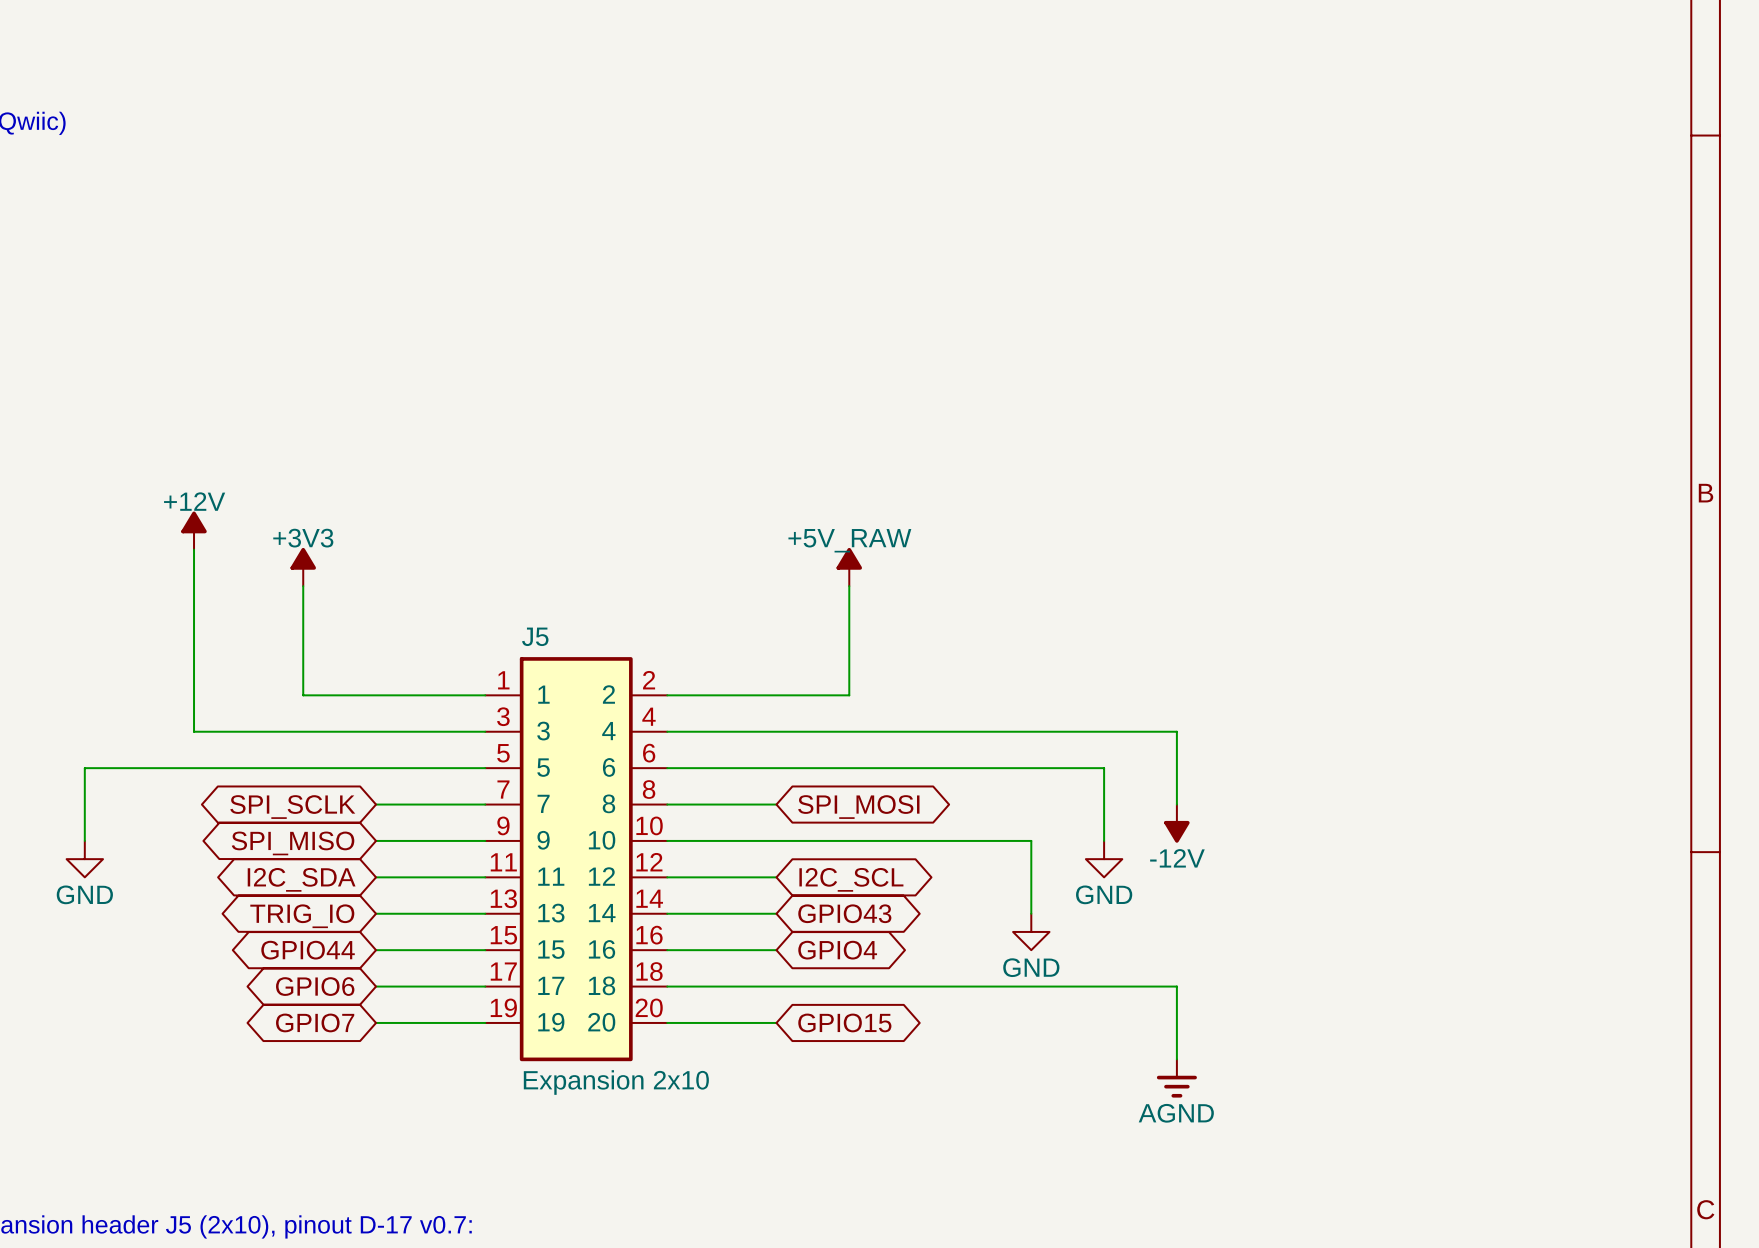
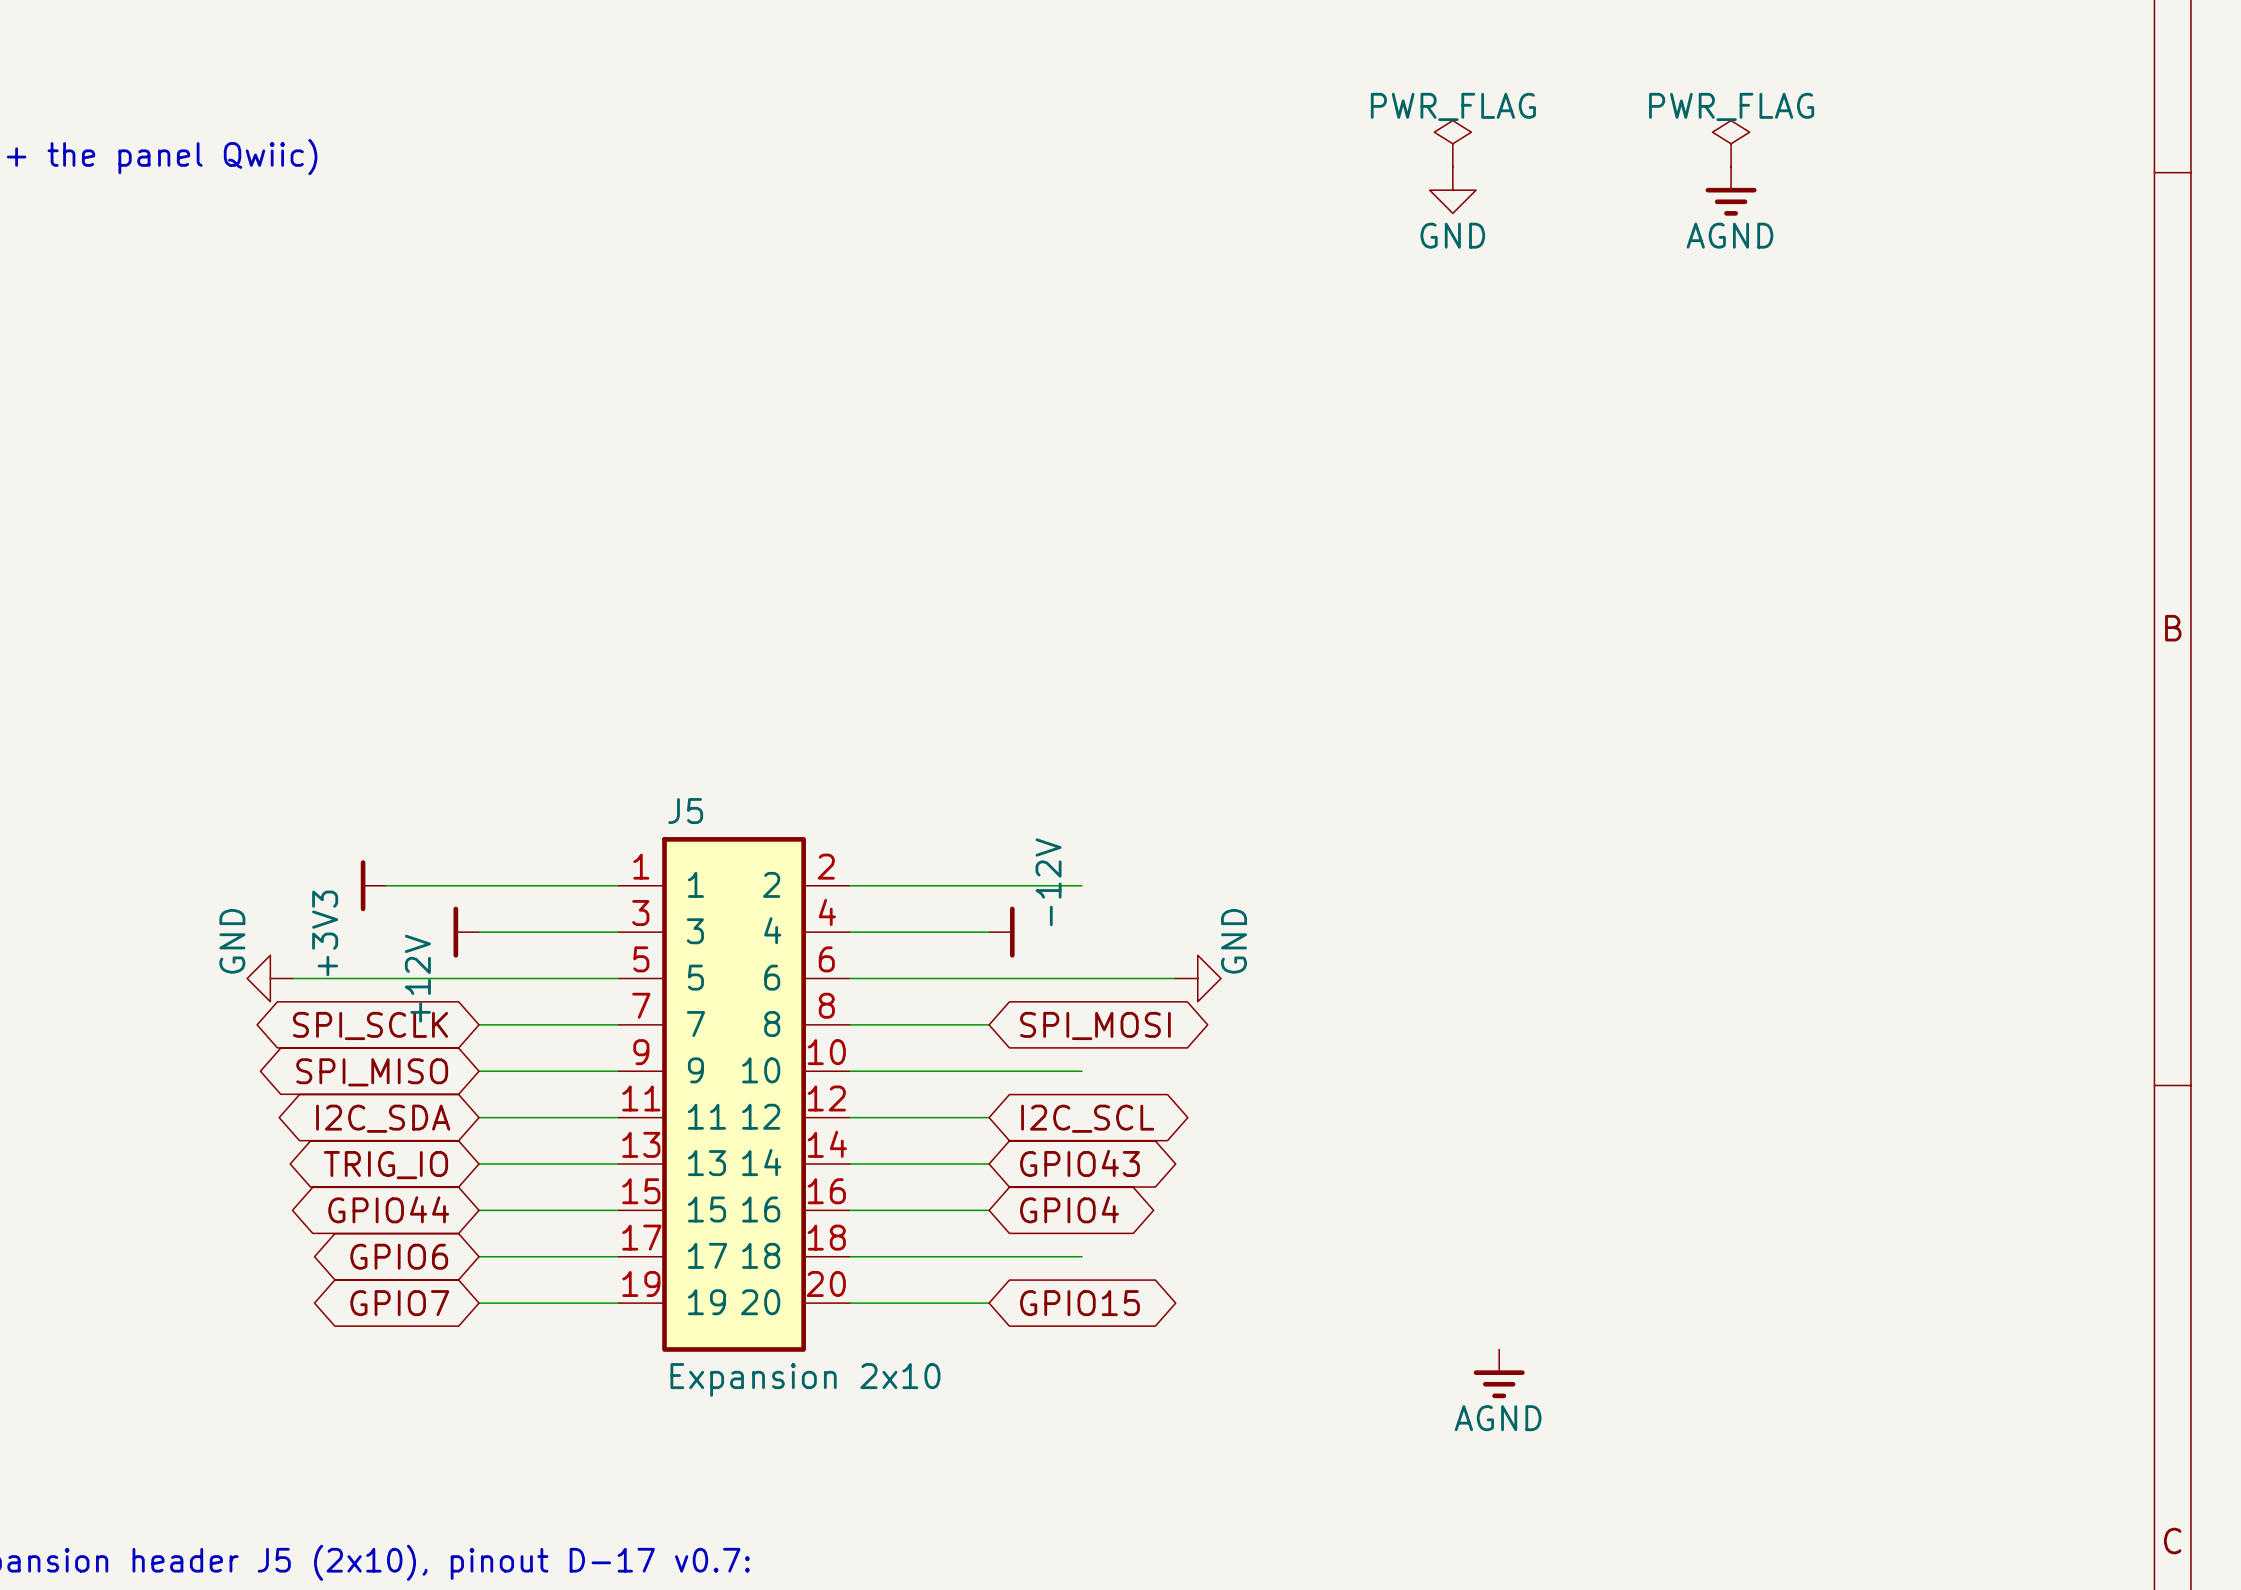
power symbol: none -> PWR_FLAG (1452, 143)
power symbol: none -> PWR_FLAG (1731, 143)
power symbol: none -> GND (1452, 190)
power symbol: none -> AGND (1731, 191)
power symbol: +12V (194, 530) -> none
wire: (194, 549) (194, 731) (376, 731) -> none
power symbol: +3V3 (303, 567) -> none
power symbol: +5V_RAW (849, 567) -> none
wire: (303, 586) (303, 695) -> none
wire: (849, 586) (849, 695) -> none
power symbol: none -> +3V3 (373, 885)
power symbol: none -> +12V (466, 932)
wire: (776, 731) (1176, 731) (1176, 804) -> none
power symbol: none -> -12V (1001, 932)
wire: (230, 768) (84, 768) (84, 840) -> none
wire: (922, 768) (1104, 768) (1104, 840) -> none
power symbol: none -> GND (1197, 978)
power symbol: -12V (1176, 823) -> none
wire: (849, 840) (1031, 840) (1031, 913) -> none
power symbol rotation: 0° (84, 859) -> 90° clockwise (270, 978)
power symbol position: GND (84, 859) -> GND (270, 978)
power symbol: GND (1104, 859) -> none
power symbol text position: GND (84, 894) -> GND (232, 941)
power symbol: GND (1031, 931) -> none
wire: (849, 986) (1176, 986) (1176, 1059) -> none

